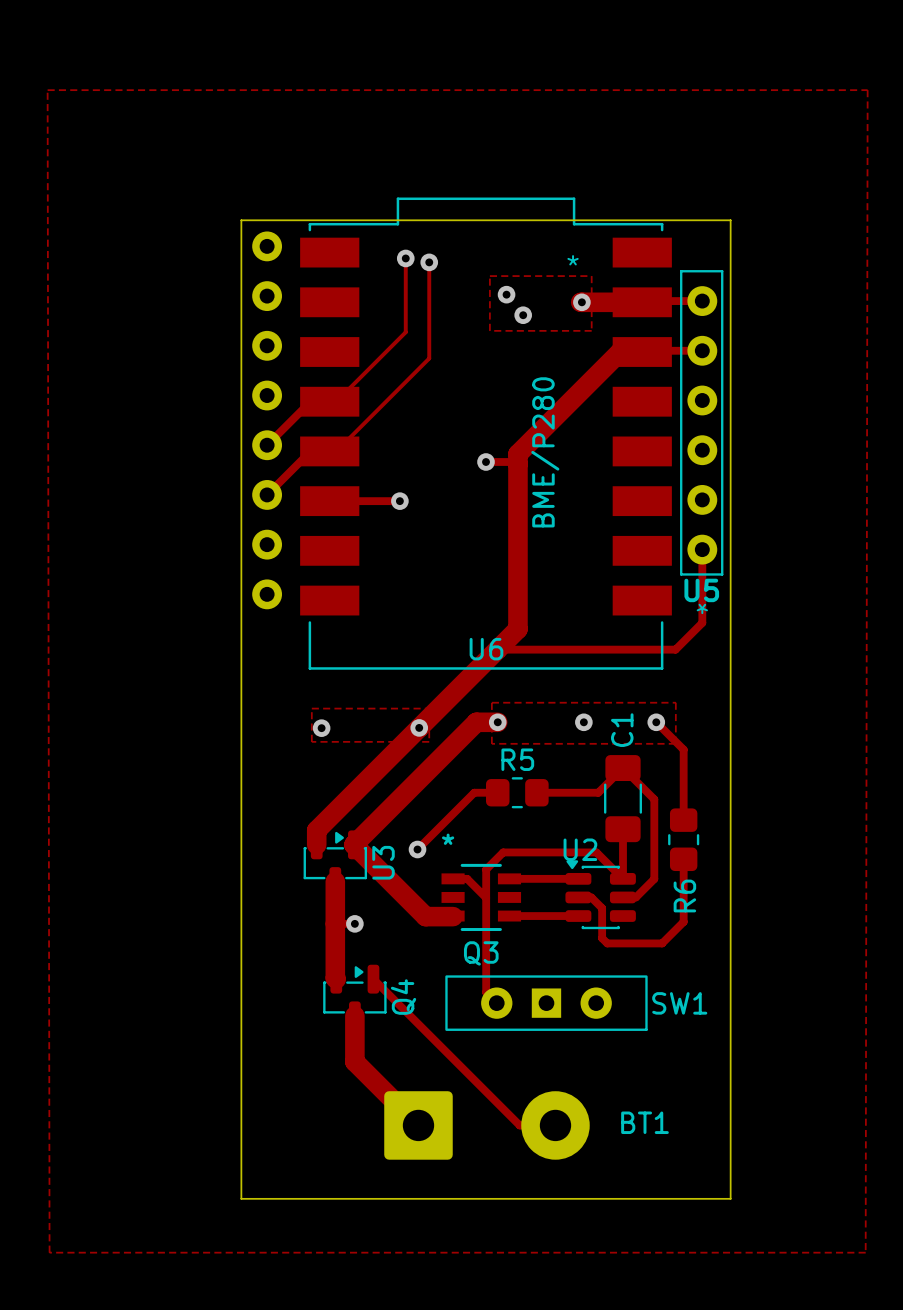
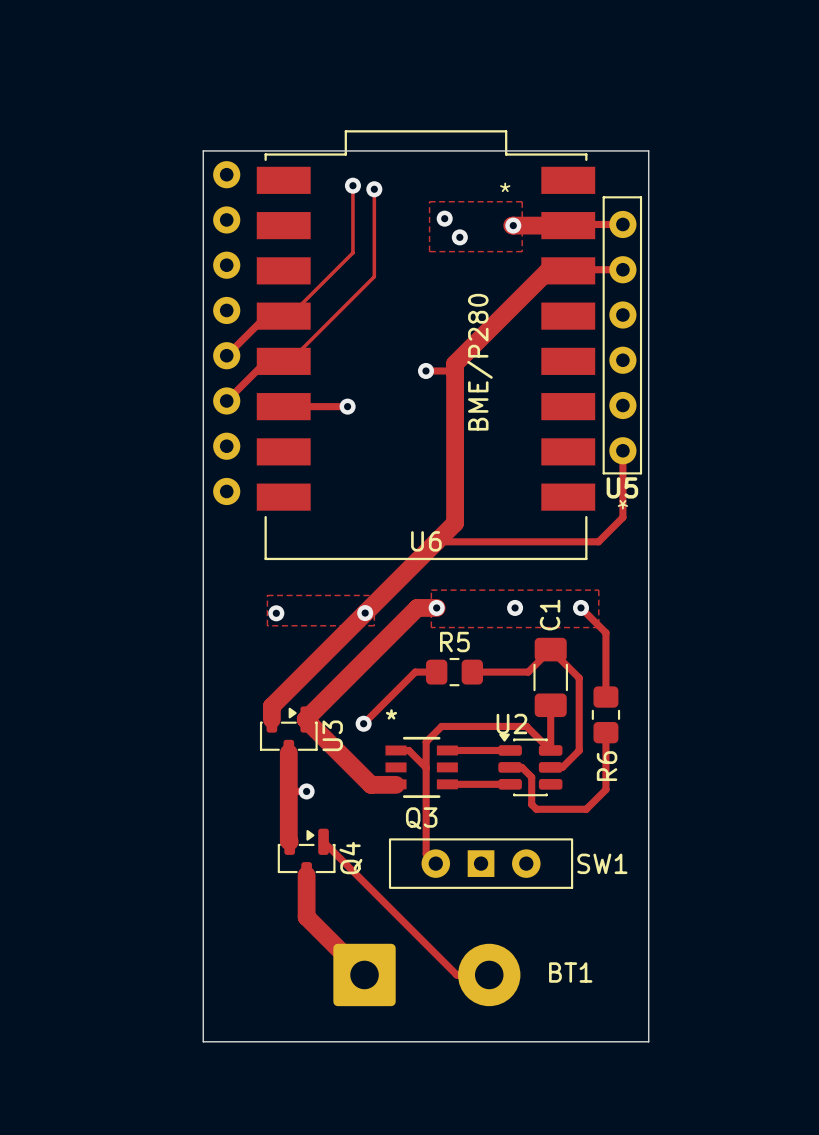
zone outline: (47, 90) (867, 90) (865, 1252) (49, 1252) (47, 90) -> none

